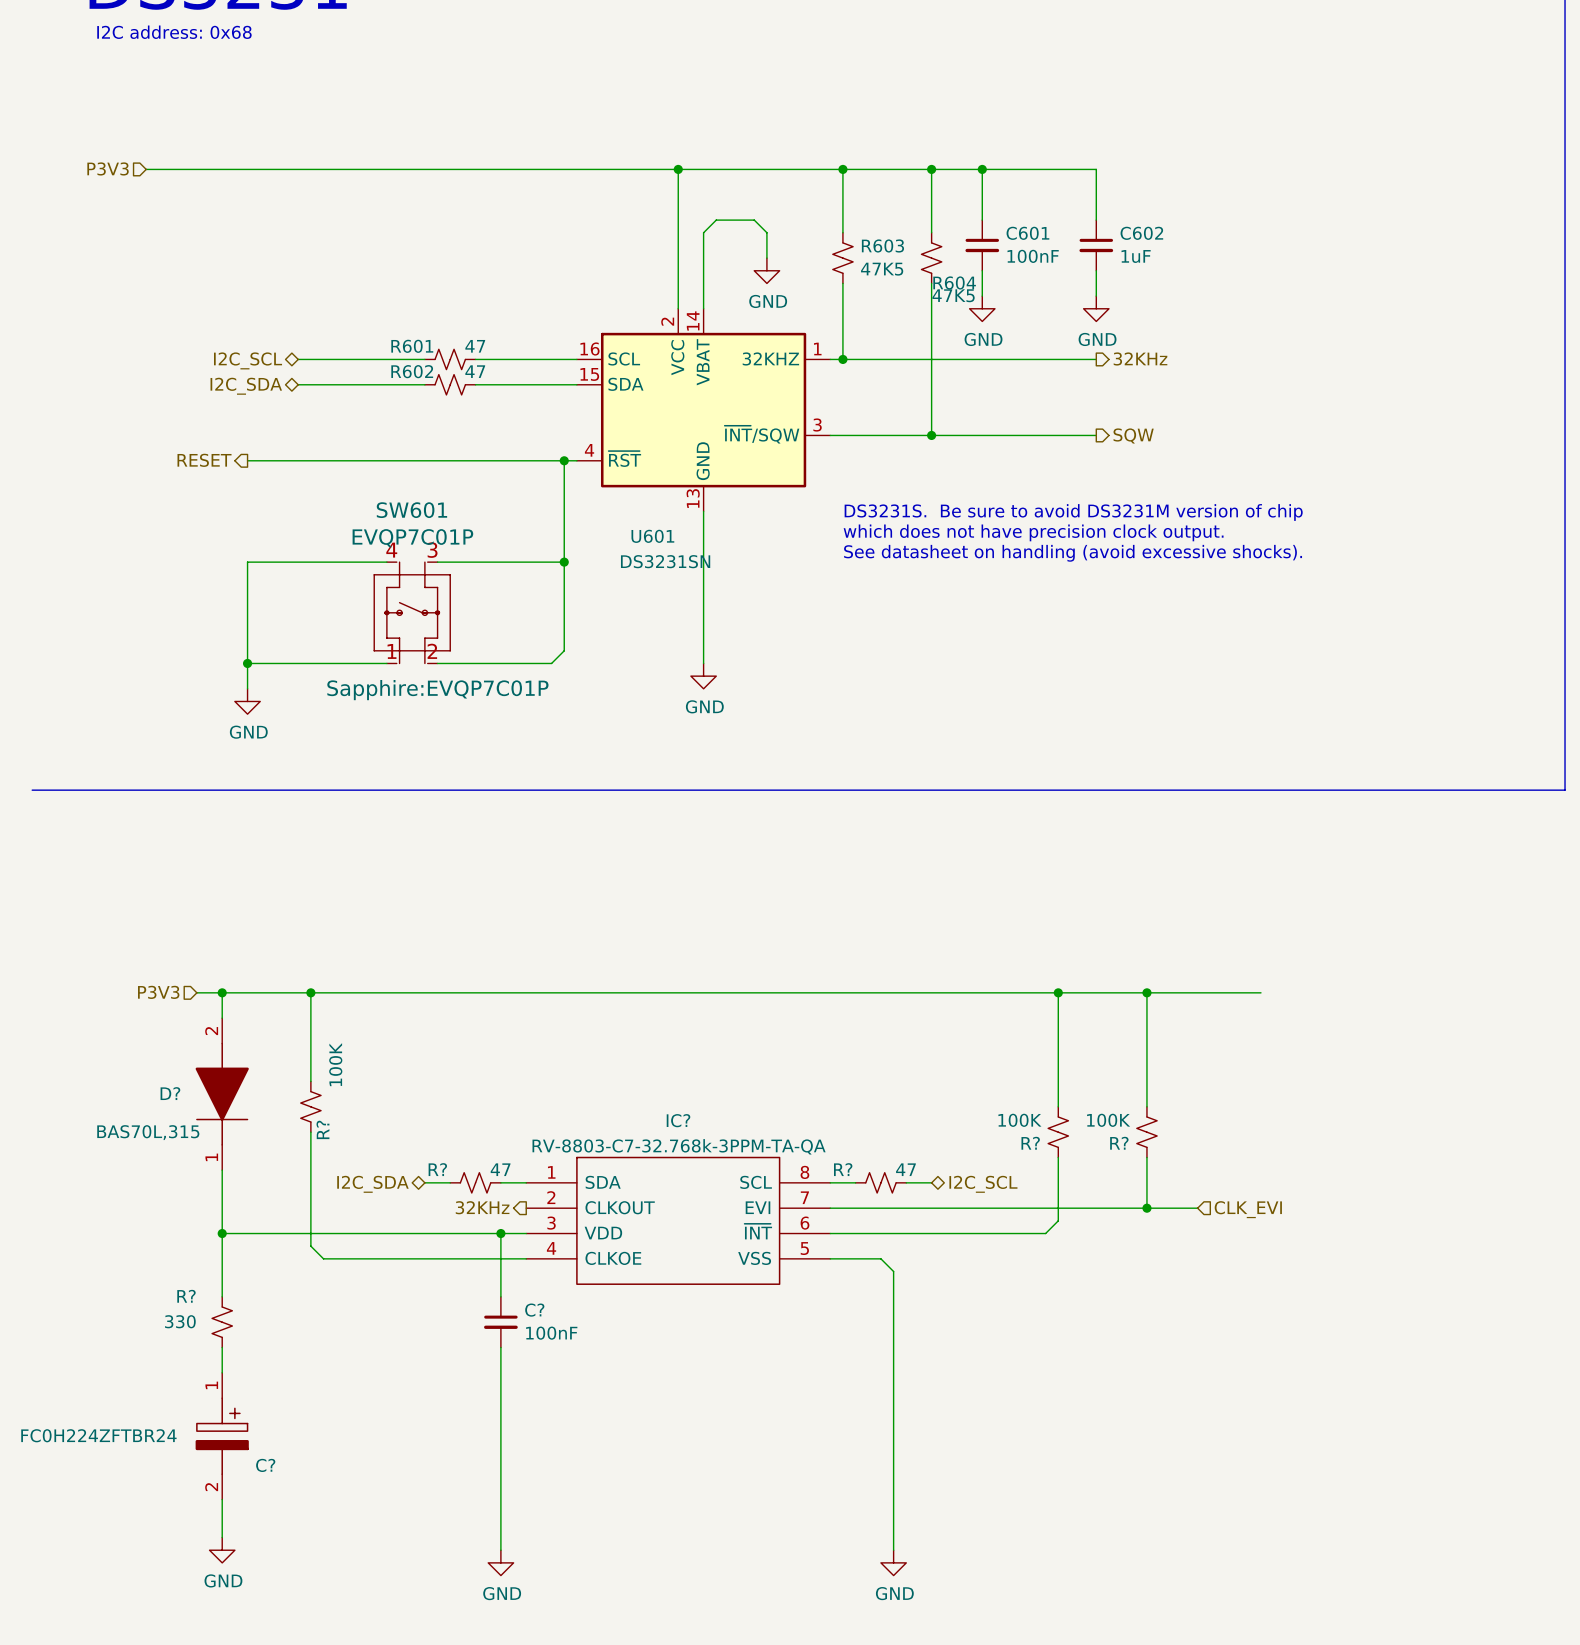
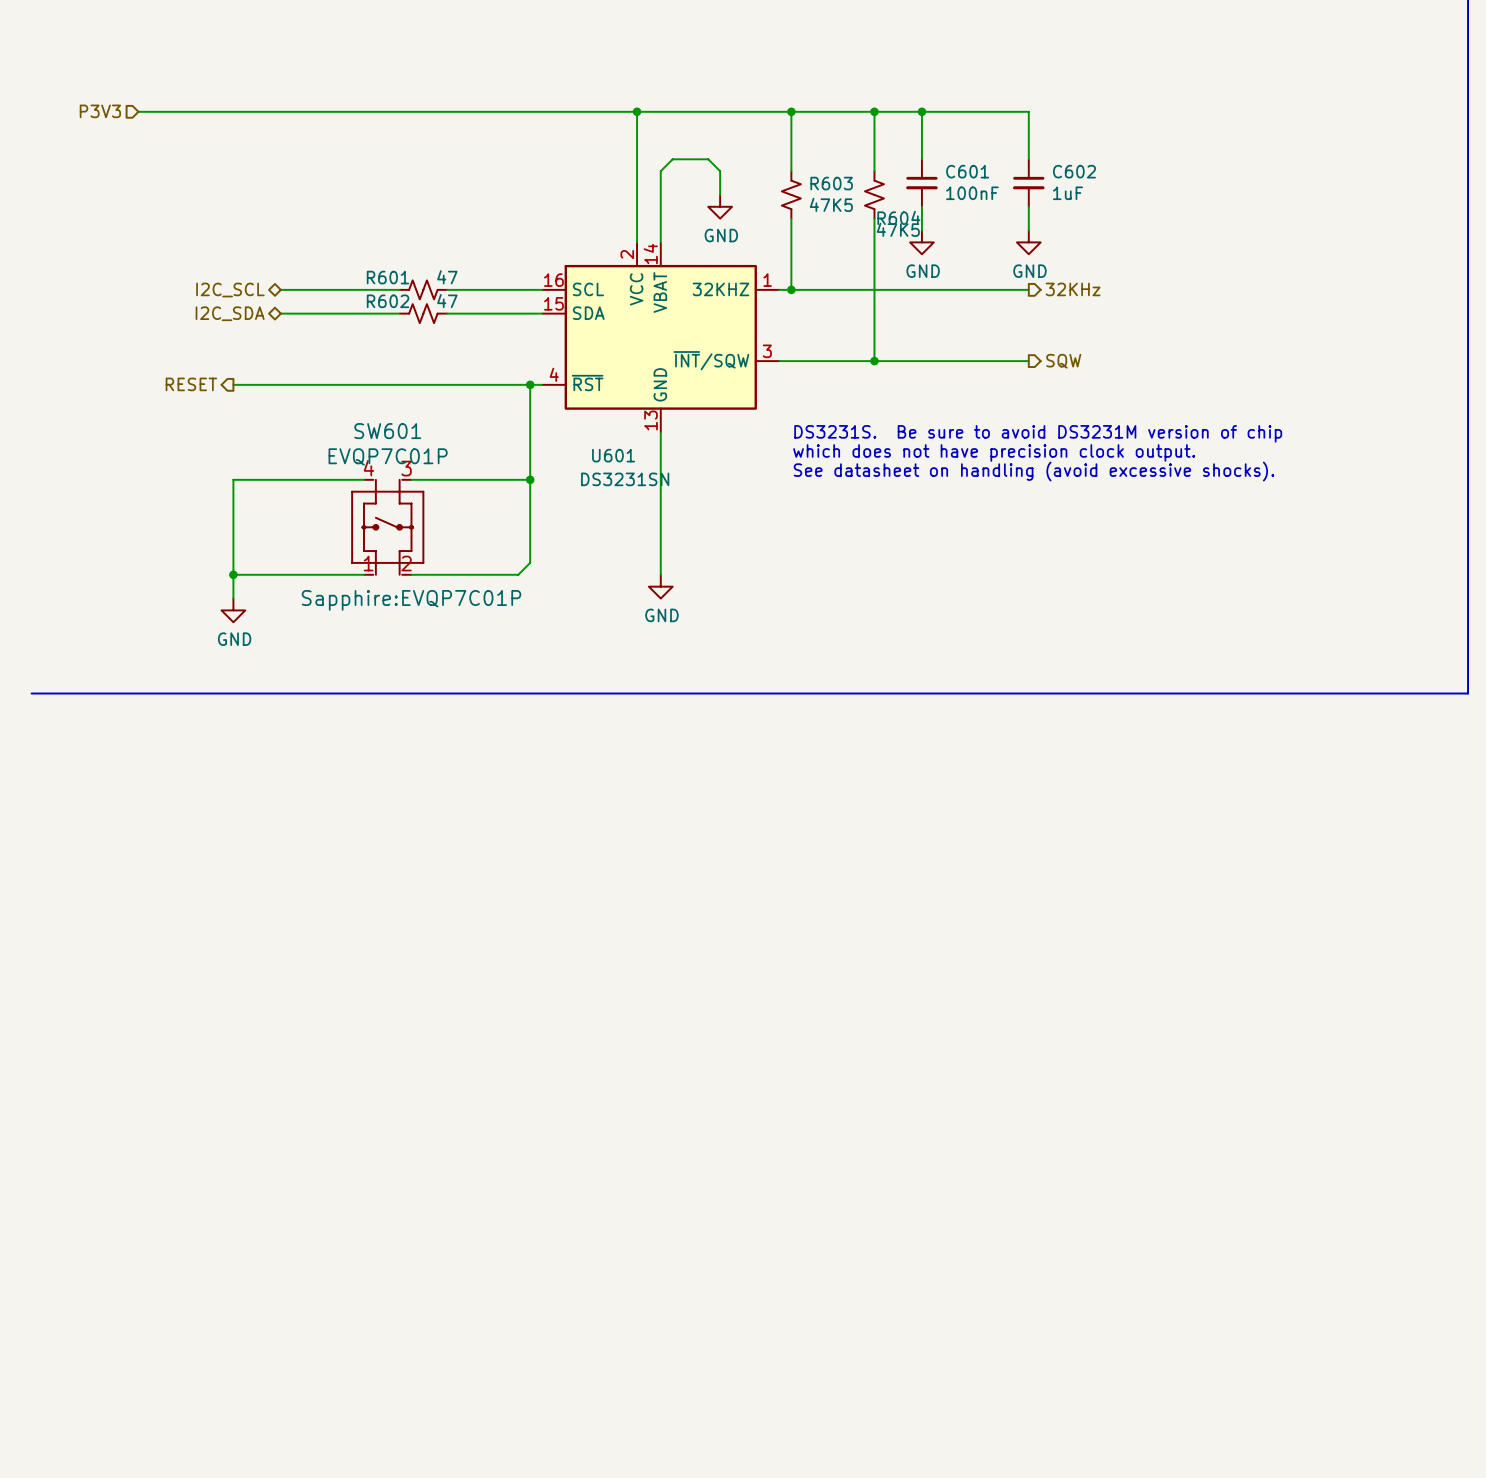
hierarchical label: P3V3 (158, 992) -> none
wire: (196, 992) (1260, 992) -> none
wire: (222, 992) (222, 1018) -> none
junction: (222, 992) -> none
wire: (310, 992) (310, 1081) -> none
junction: (310, 992) -> none
wire: (1058, 992) (1058, 1106) -> none
junction: (1058, 992) -> none
wire: (1146, 992) (1146, 1106) -> none
junction: (1146, 992) -> none
D?: BAS70L,315 (222, 1094) -> none
R?: 100K (310, 1106) -> none
wire: (310, 1132) (310, 1246) (323, 1258) (526, 1258) -> none
R?: 100K (1058, 1132) -> none
R?: 100K (1146, 1132) -> none
wire: (1058, 1157) (1058, 1220) (1045, 1233) (830, 1233) -> none
wire: (1146, 1157) (1146, 1208) -> none
wire: (222, 1170) (222, 1296) -> none
wire: (424, 1182) (450, 1182) -> none
R?: 47 (475, 1182) -> none
wire: (500, 1182) (526, 1182) -> none
wire: (830, 1182) (855, 1182) -> none
R?: 47 (880, 1182) -> none
wire: (906, 1182) (931, 1182) -> none
hierarchical label: I2C_SDA (372, 1184) -> none
hierarchical label: I2C_SCL (983, 1184) -> none
hierarchical label: 32KHz (482, 1207) -> none
wire: (830, 1208) (1197, 1208) -> none
junction: (1146, 1208) -> none
hierarchical label: CLK_EVI (1248, 1209) -> none
IC?: RV-8803-C7-32.768k-3PPM-TA-QA (678, 1220) -> none
wire: (222, 1233) (526, 1233) -> none
junction: (222, 1233) -> none
wire: (500, 1233) (500, 1296) -> none
junction: (500, 1233) -> none
wire: (830, 1258) (880, 1258) (893, 1271) (893, 1550) -> none
R?: 330 (222, 1322) -> none
C?: 100nF (500, 1322) -> none
wire: (222, 1347) (222, 1372) -> none
wire: (500, 1347) (500, 1550) -> none
C?: FC0H224ZFTBR24 (222, 1436) -> none
wire: (222, 1499) (222, 1537) -> none
power symbol: GND (222, 1550) -> none
power symbol: GND (500, 1562) -> none
power symbol: GND (893, 1562) -> none

